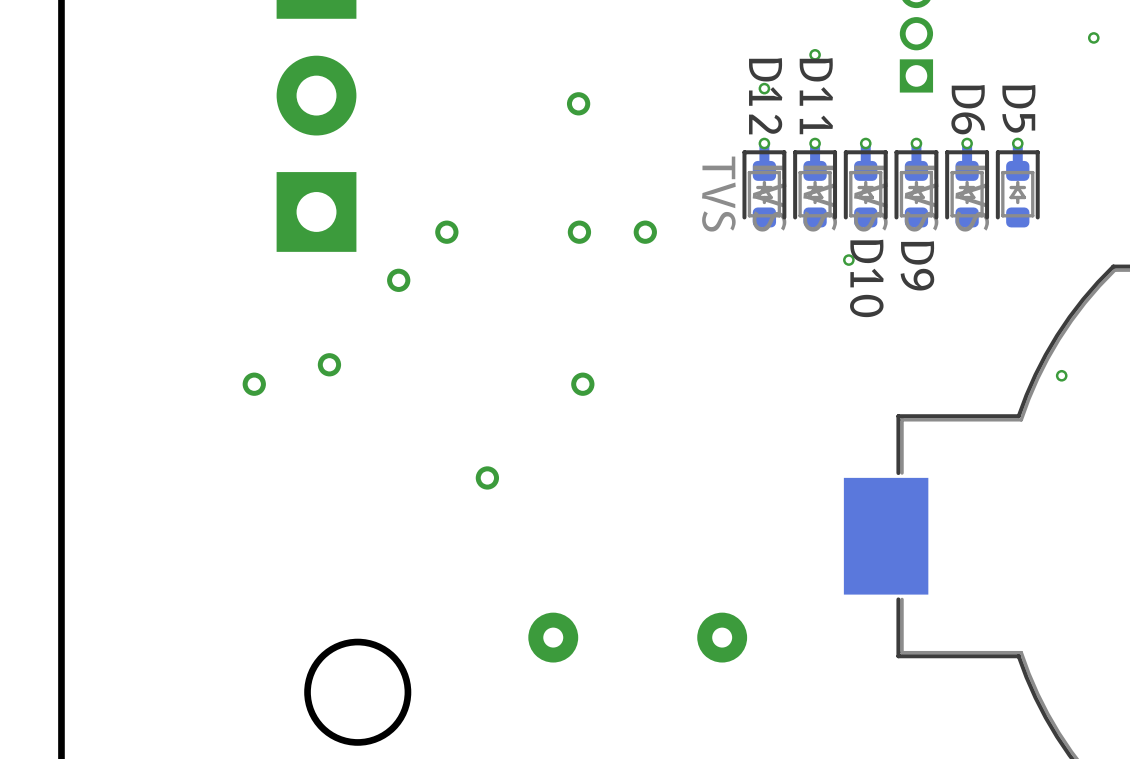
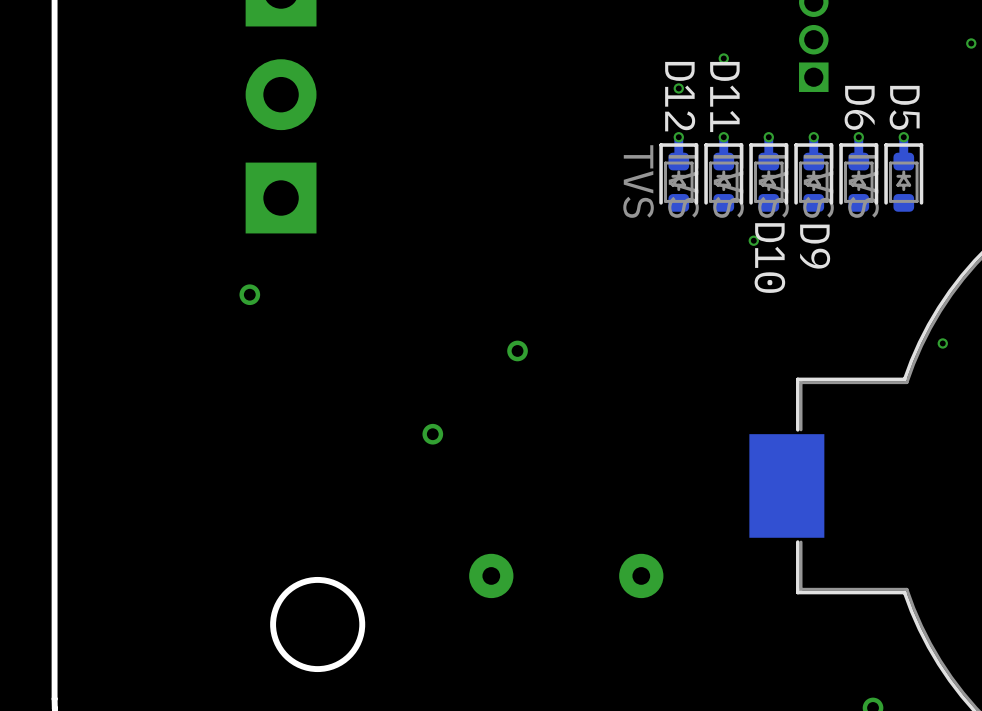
via: (578, 103) -> none
via: (446, 232) -> none
via: (579, 232) -> none
via: (645, 232) -> none
via: (398, 280) -> none
via: none -> (249, 294)
via: (329, 364) -> none
via: (254, 384) -> none

